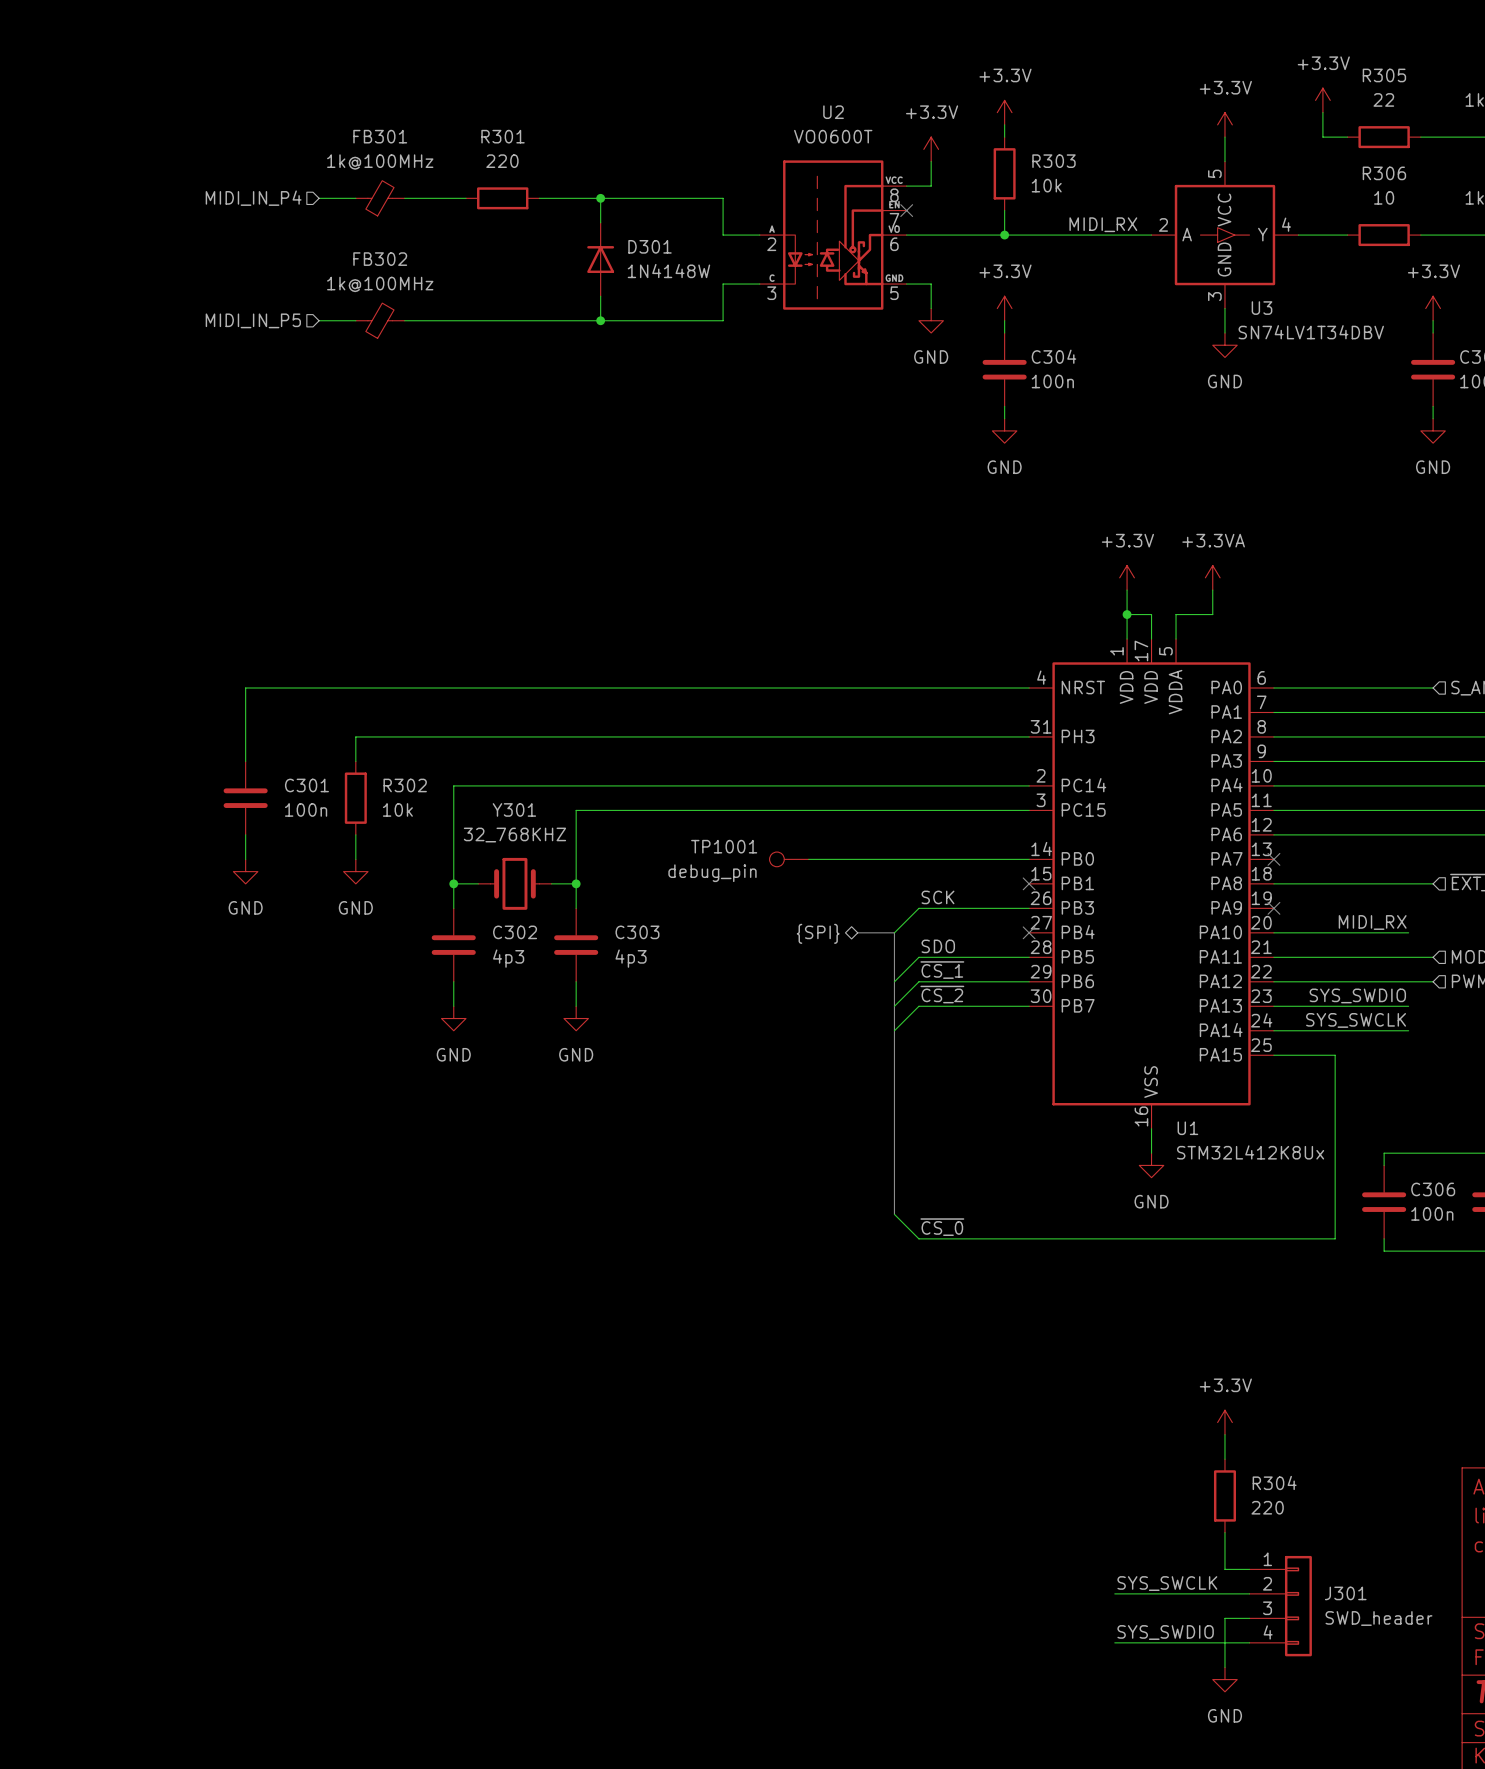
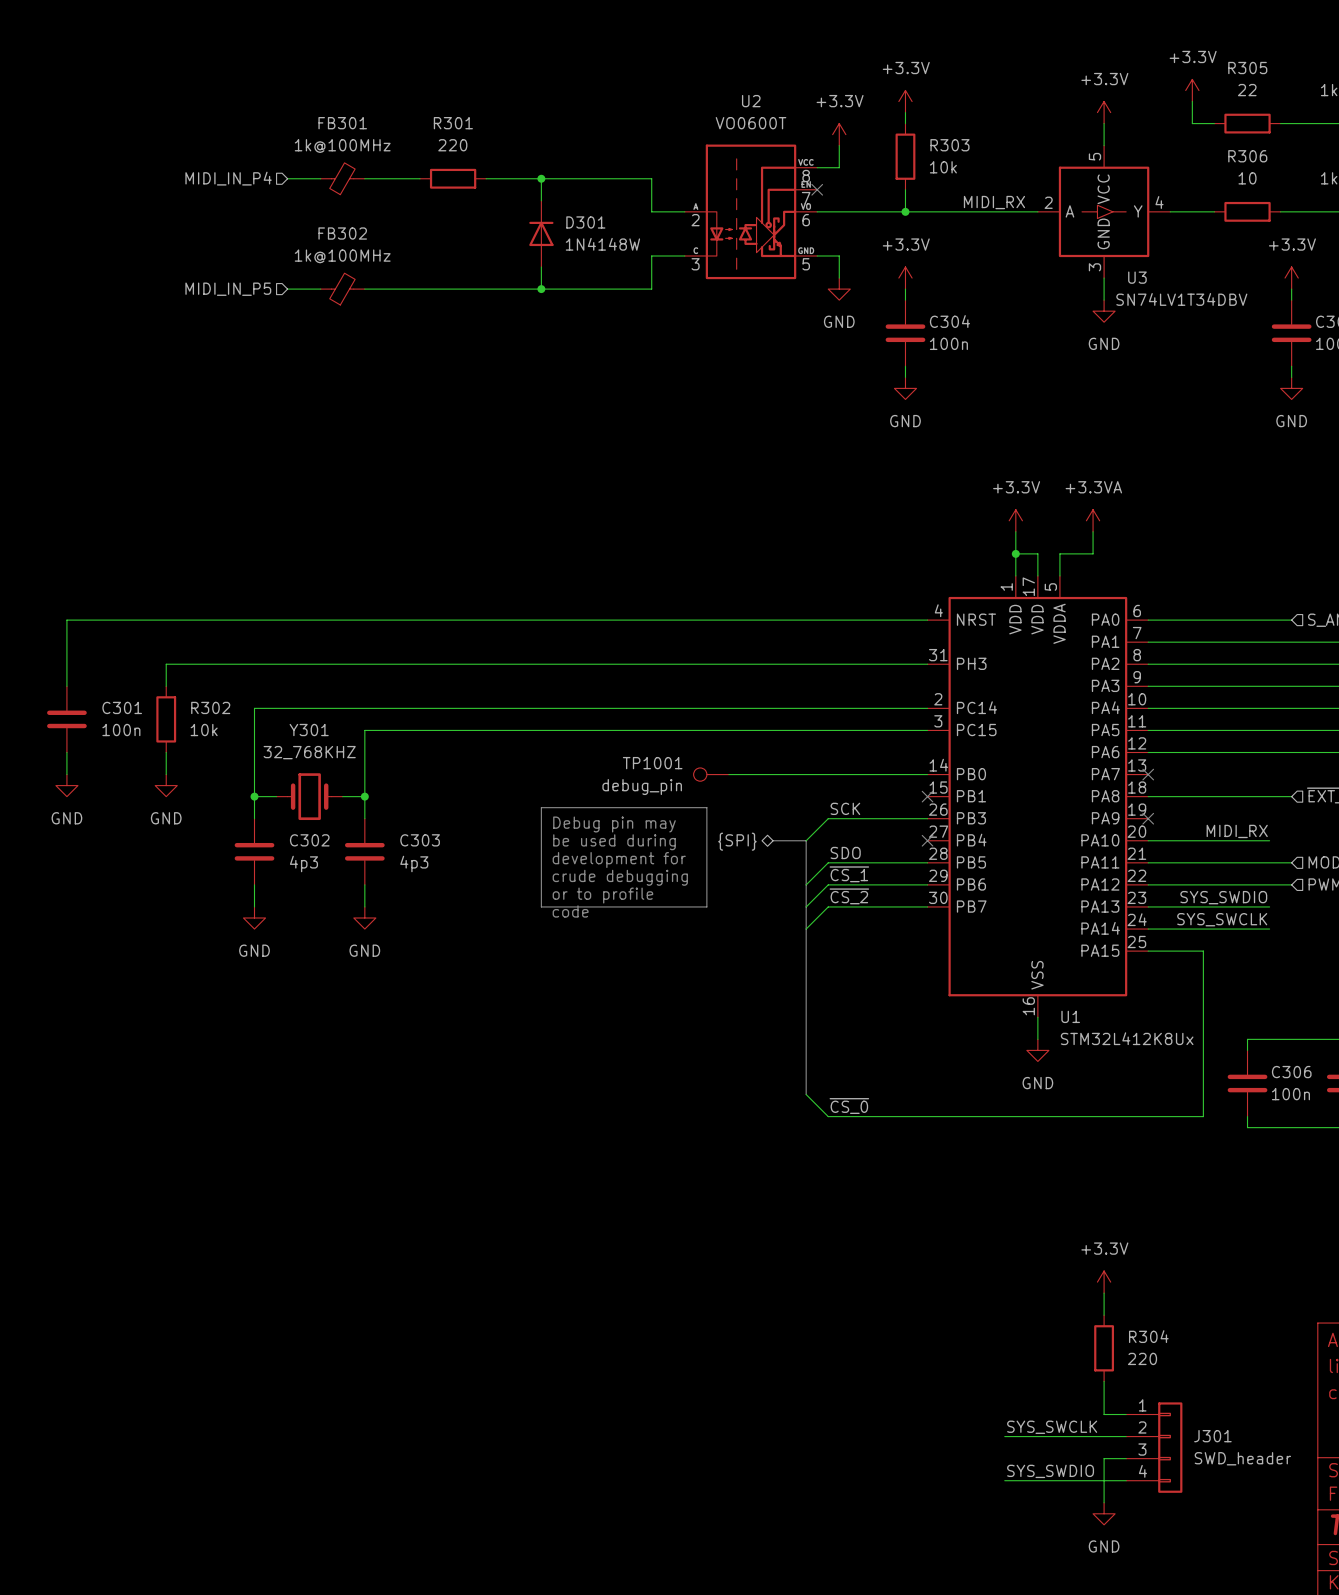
wire: (245, 688) (245, 761) -> (221, 620) (66, 620) (66, 686)
wire: (355, 736) (355, 761) -> (320, 664) (166, 664) (166, 686)
wire: (453, 785) (453, 908) -> (408, 708) (254, 708) (254, 818)
C301 position: (245, 798) -> (66, 719)
R302 position: (355, 798) -> (166, 719)
wire: (576, 810) (576, 908) -> (519, 730) (364, 730) (364, 818)
wire: (245, 834) (245, 859) -> (66, 752) (66, 774)
wire: (355, 834) (355, 859) -> (166, 752) (166, 774)
power symbol: none -> GND (66, 785)
power symbol position: GND (245, 871) -> GND (166, 785)
power symbol: GND (355, 871) -> none
junction: none -> (254, 796)
wire: (453, 883) (478, 883) -> (254, 796) (276, 796)
junction position: (453, 883) -> (364, 796)
Y301 position: (514, 883) -> (309, 796)
wire: (551, 883) (576, 883) -> (342, 796) (364, 796)
junction: (576, 883) -> none
line: none -> (541, 807) (706, 807) (706, 906) (541, 906) (541, 807)
text: none -> Debug pin may (614, 824)
text: none -> be used during (614, 842)
C302 position: (453, 945) -> (254, 851)
C303 position: (576, 945) -> (364, 851)
text: none -> development for (619, 860)
text: none -> crude debugging (620, 877)
wire: (453, 981) (453, 1006) -> (254, 884) (254, 906)
wire: (576, 981) (576, 1006) -> (364, 884) (364, 906)
text: none -> or to profile (602, 895)
text: none -> code (570, 911)
power symbol: none -> GND (254, 918)
power symbol position: GND (453, 1018) -> GND (364, 918)
power symbol: GND (576, 1018) -> none

